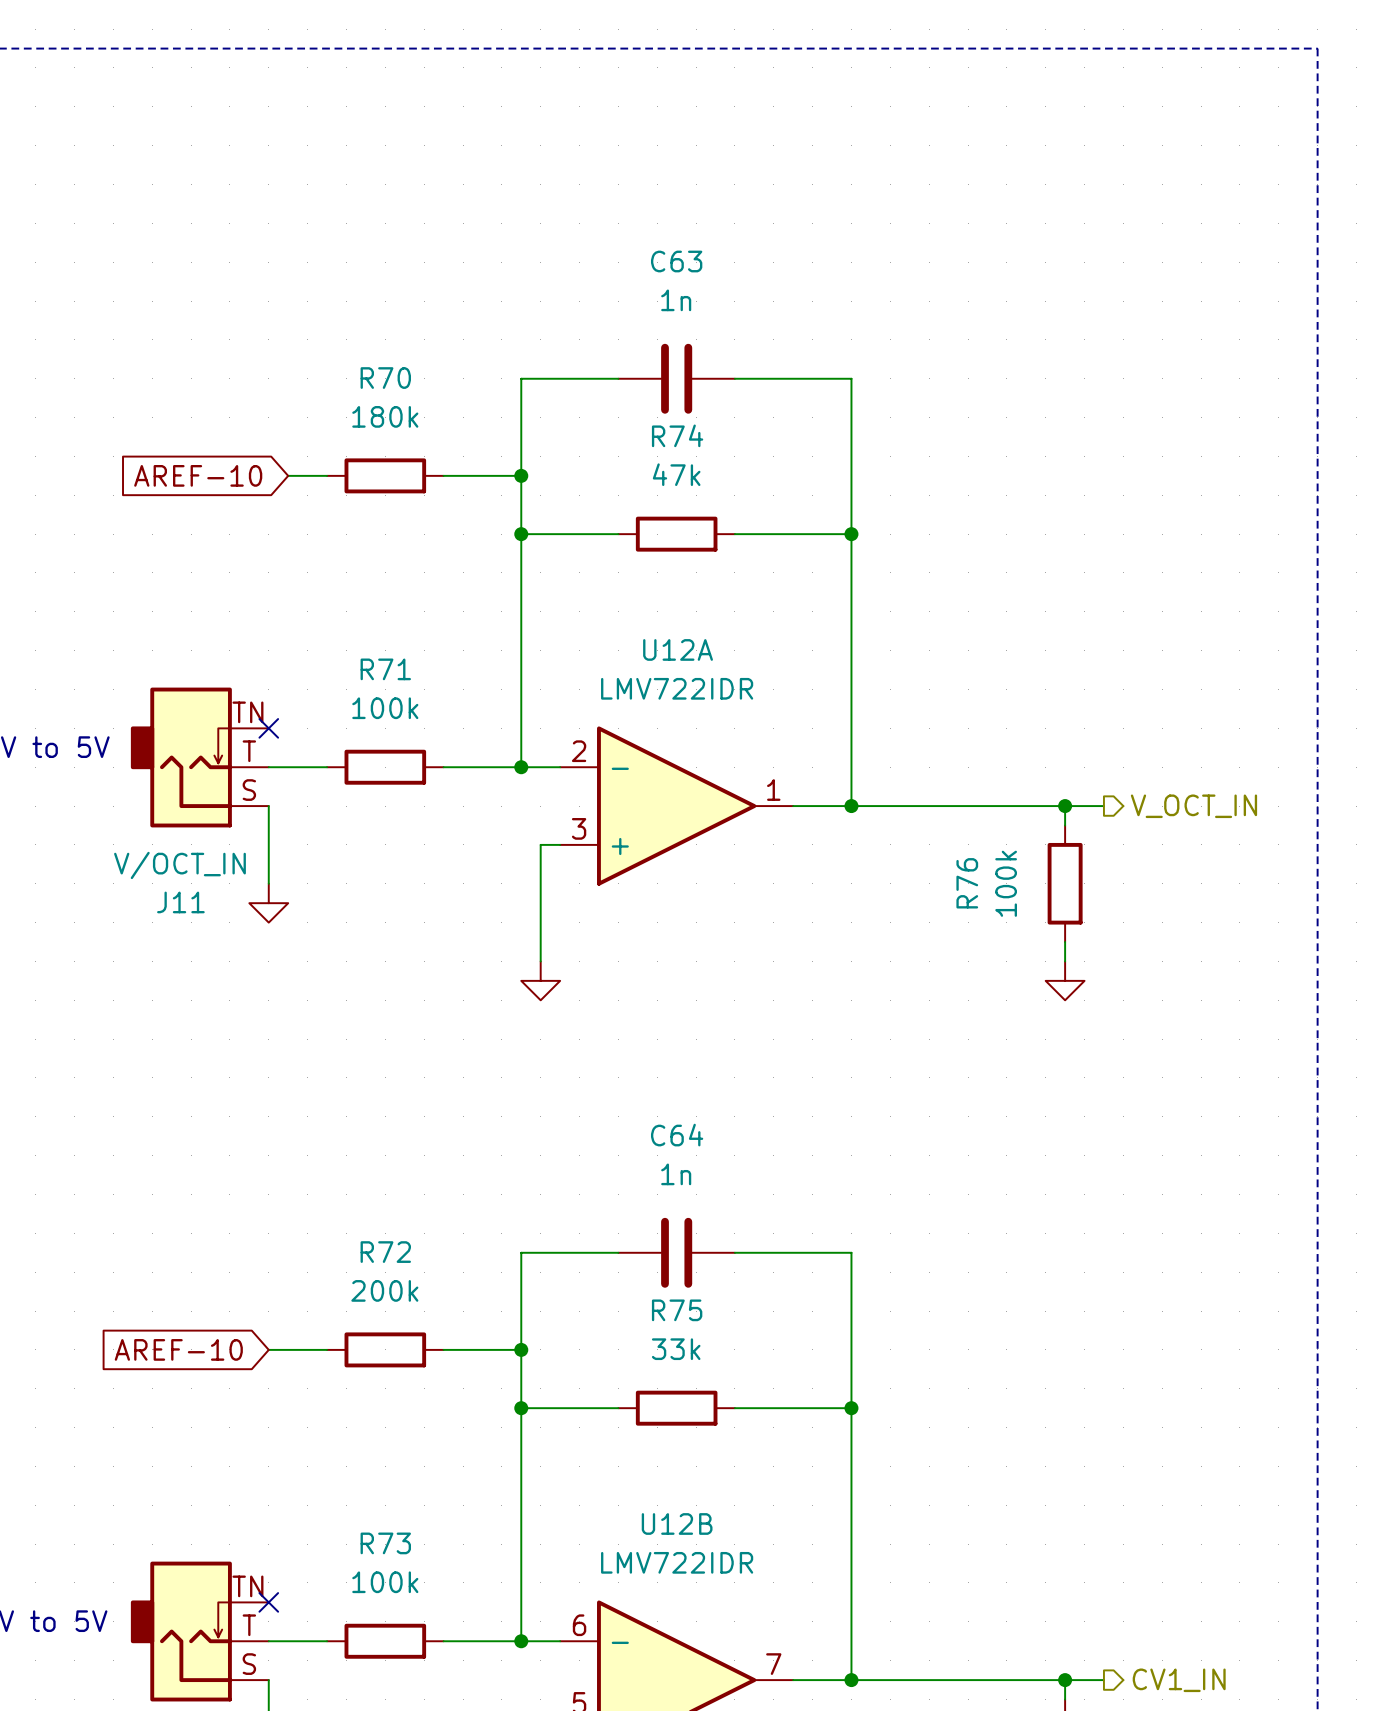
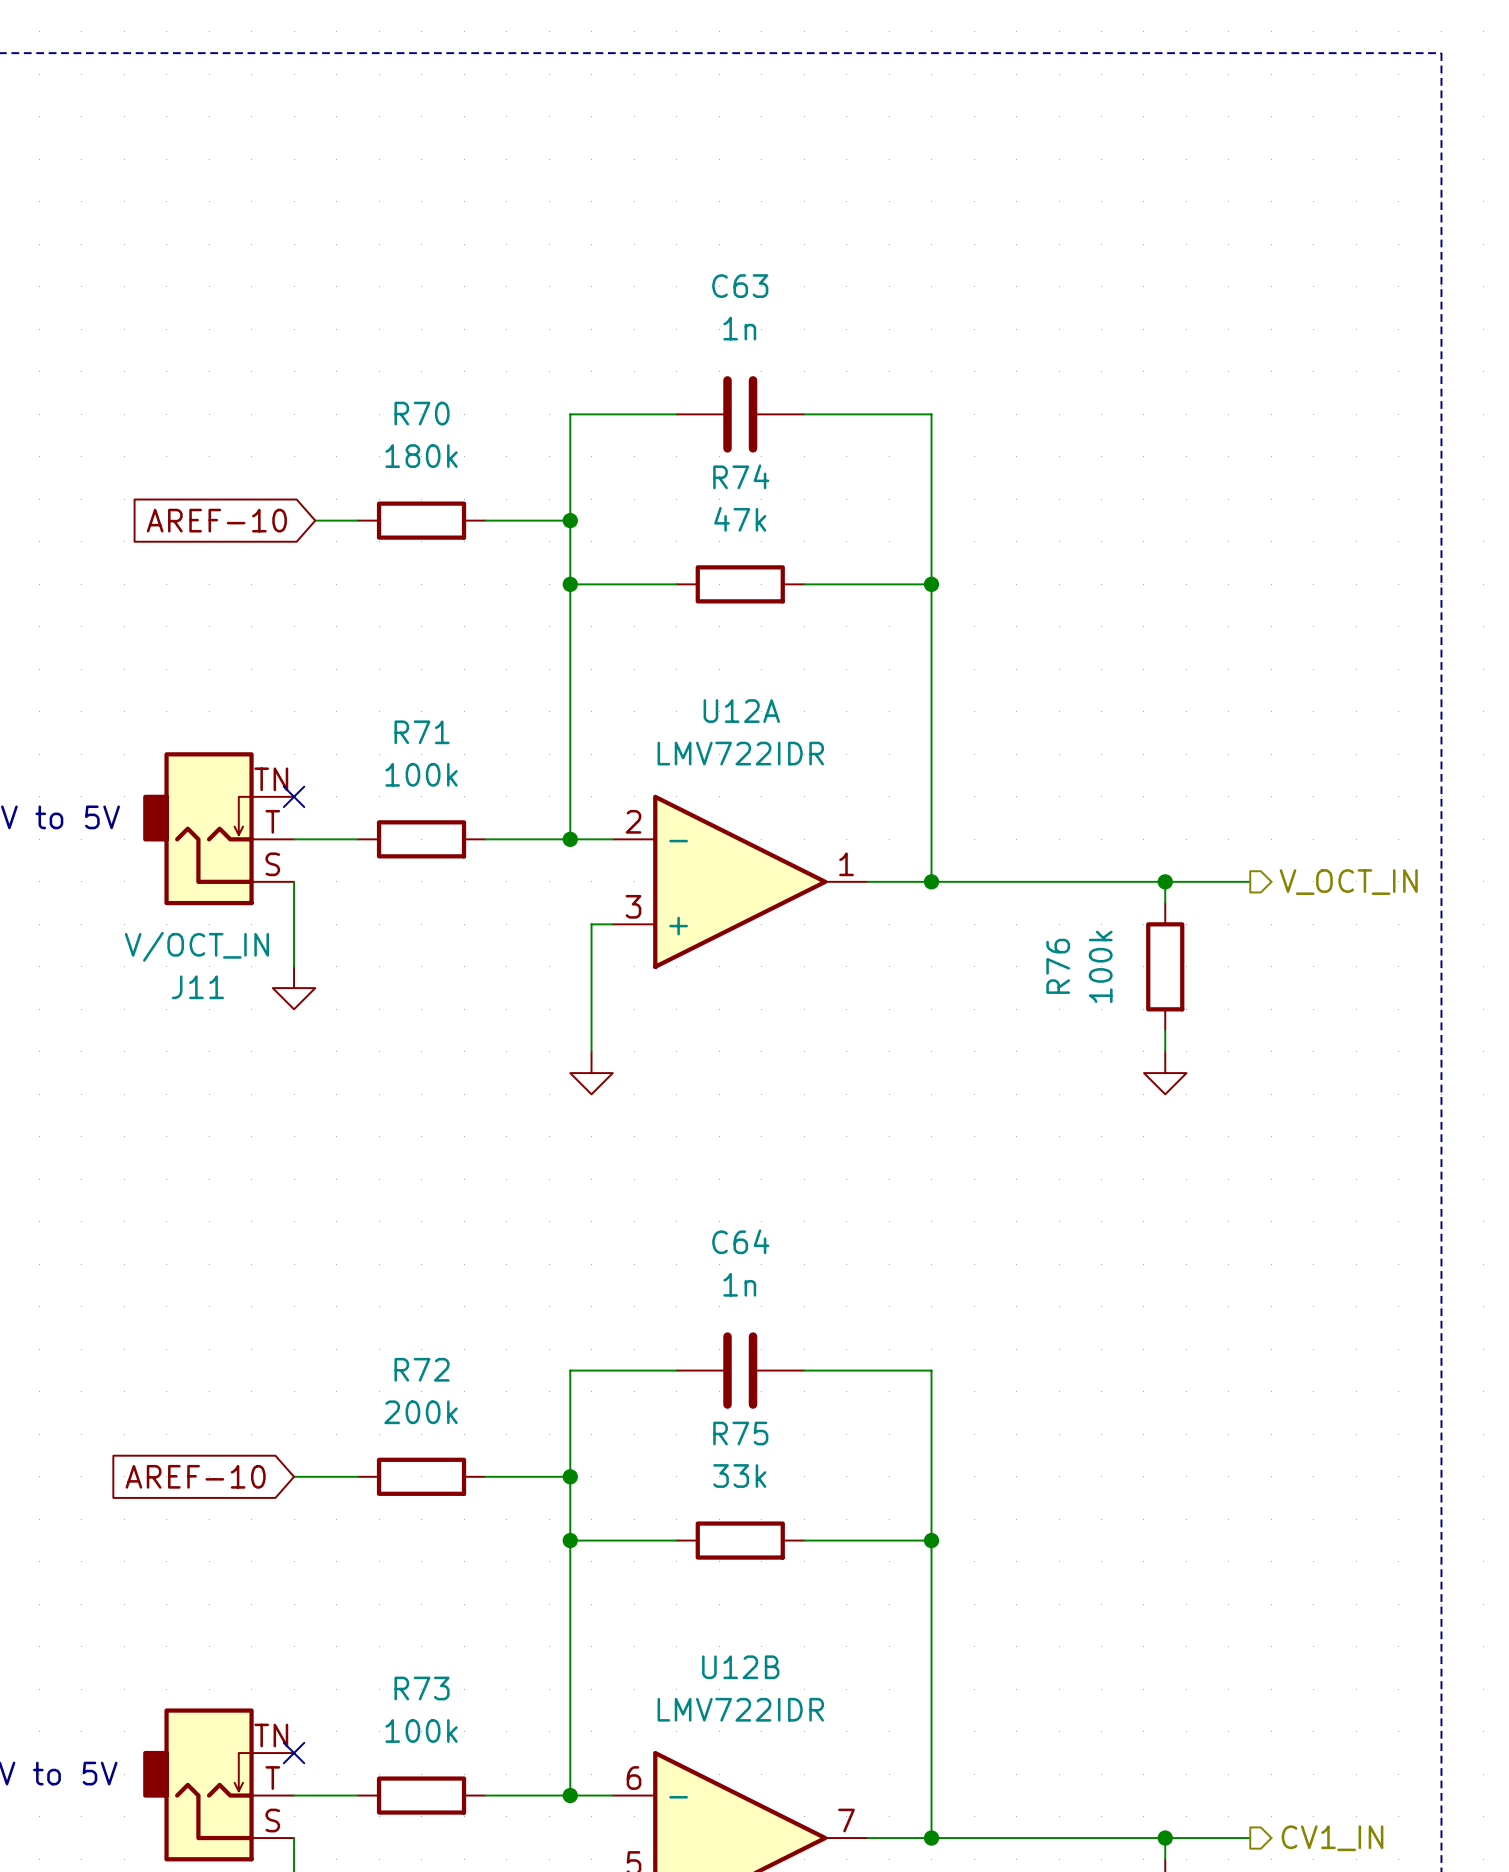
wire: none -> (1207, 881) (1250, 881)
hierarchical label position: V_OCT_IN (1193, 806) -> V_OCT_IN (1348, 882)
wire: none -> (1207, 1838) (1250, 1838)
hierarchical label position: CV1_IN (1179, 1680) -> CV1_IN (1332, 1838)

